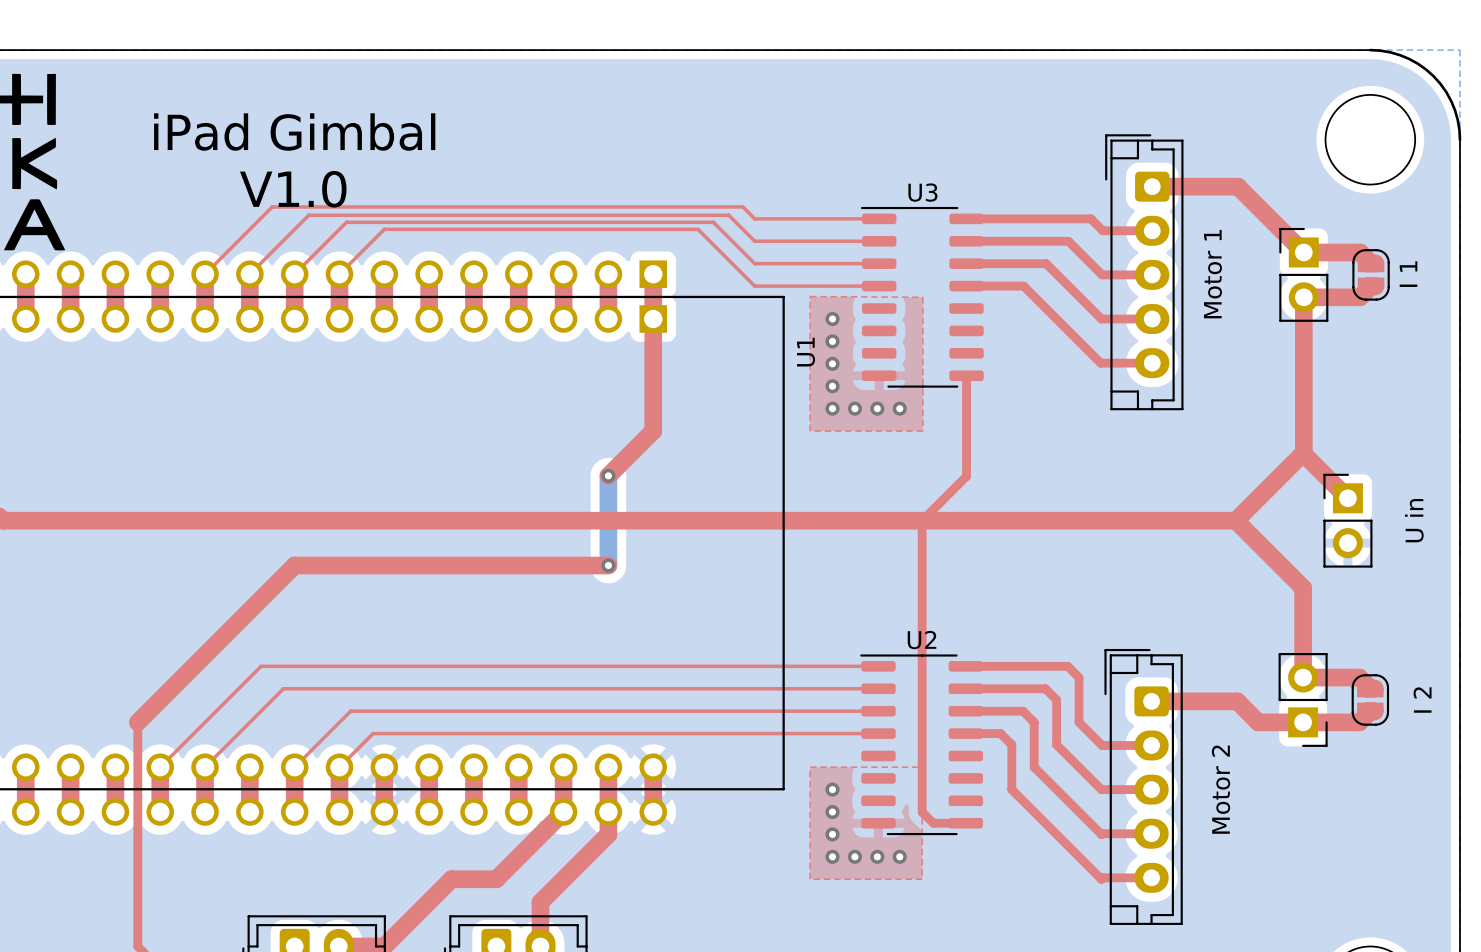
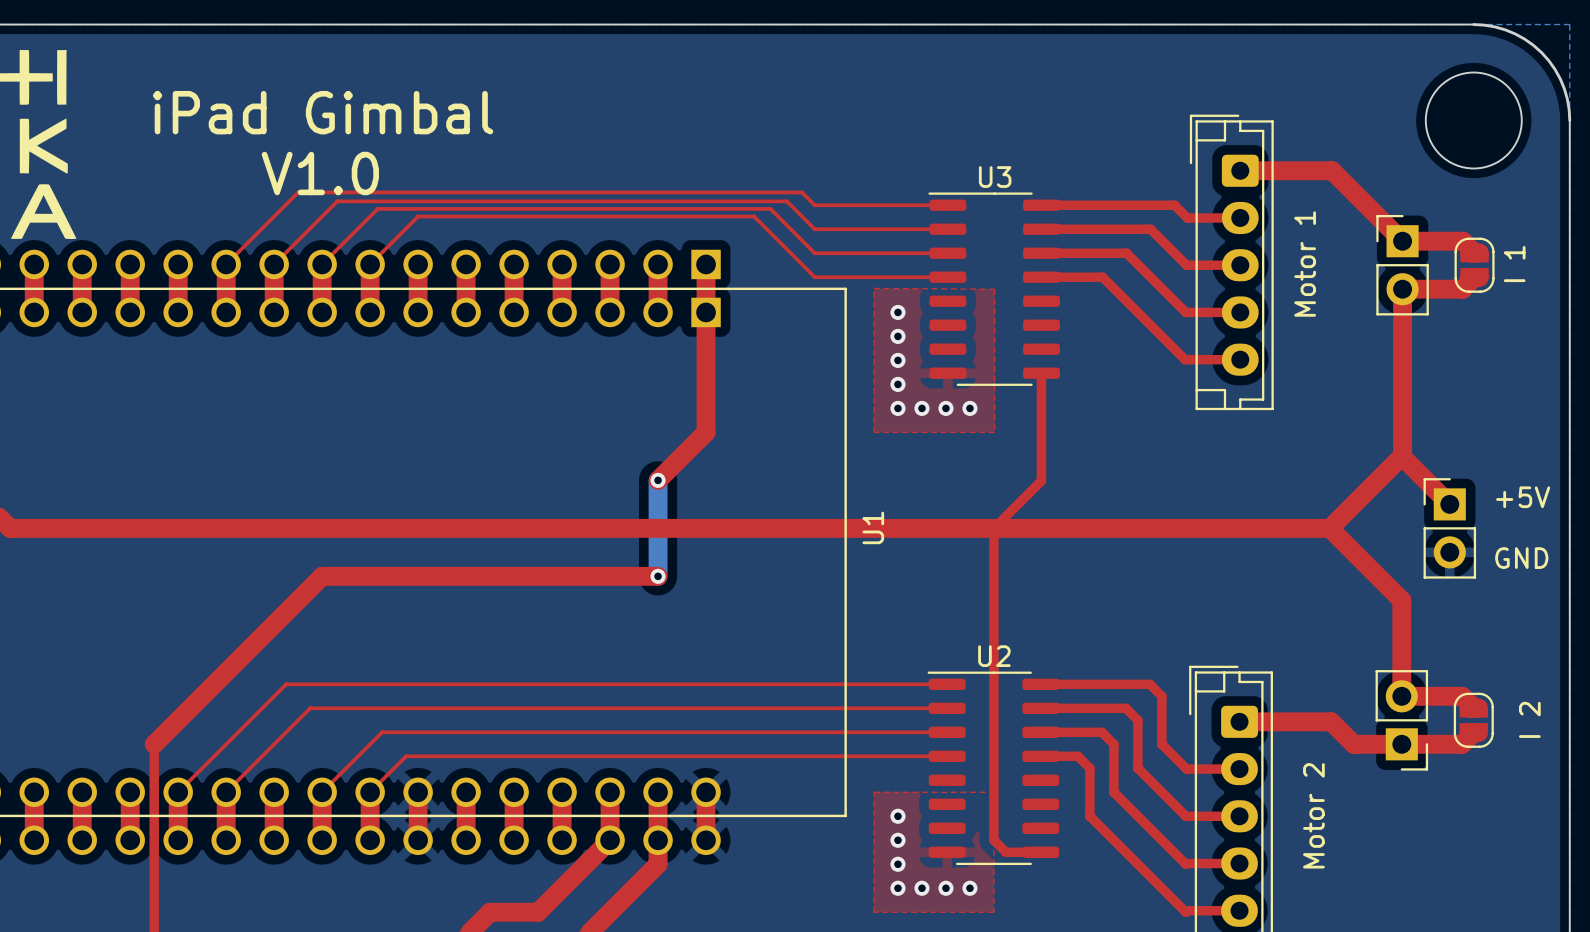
U1 name position: U1 (806, 352) -> U1 (873, 527)
text: none -> +5V (1523, 497)
text: U in (1414, 520) -> none
text: none -> GND (1521, 558)

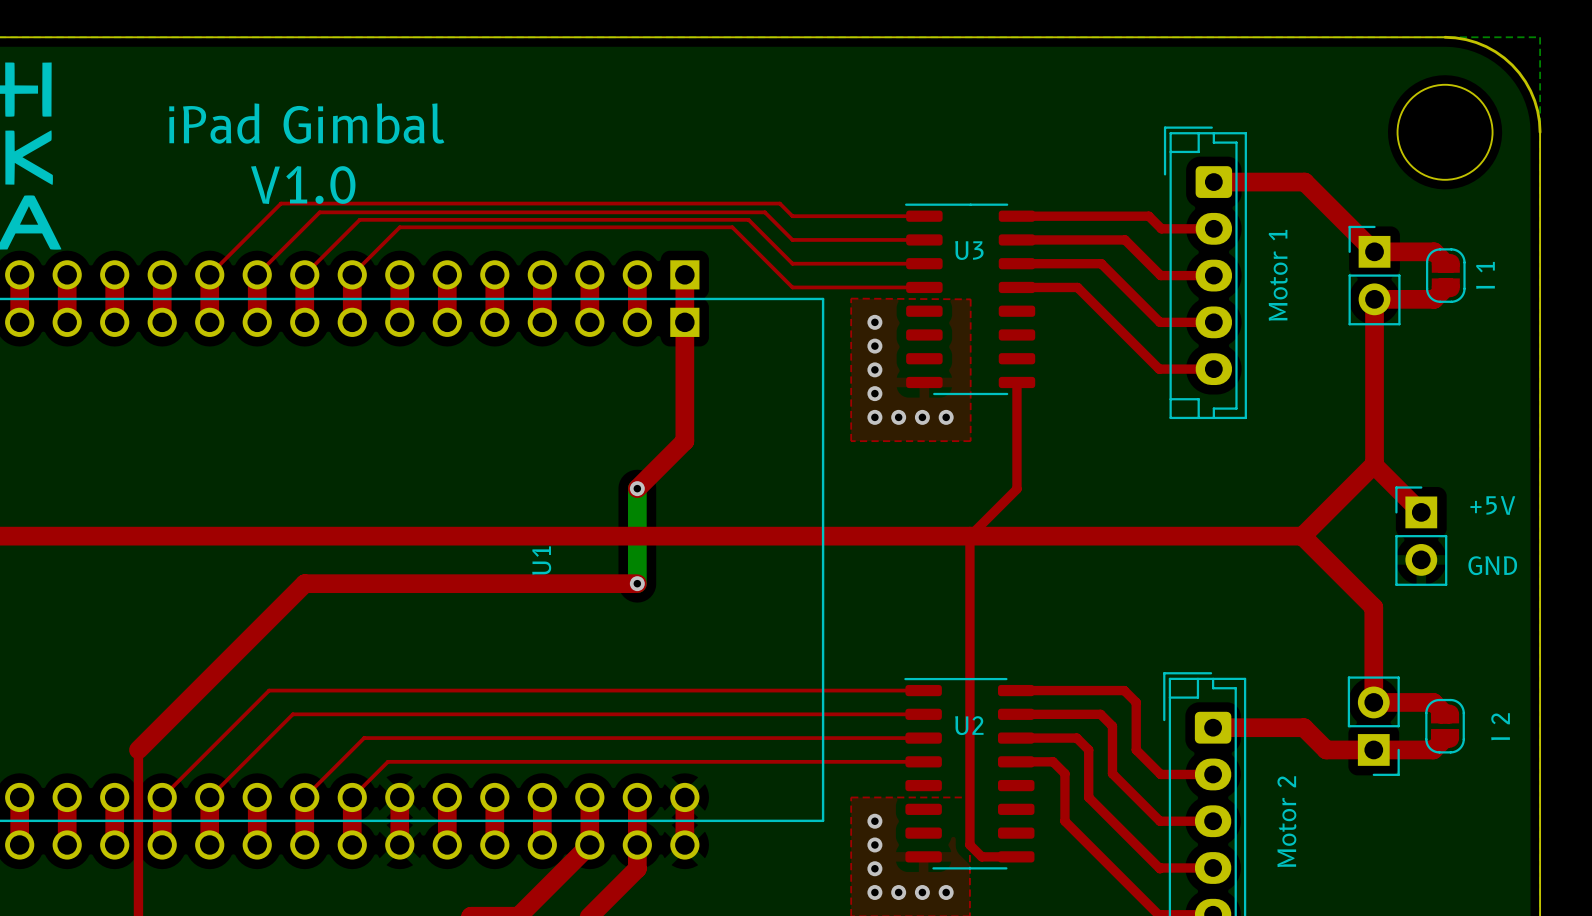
U3 name position: U3 (995, 177) -> U3 (969, 250)
U1 name position: U1 (873, 527) -> U1 (541, 560)
U2 name position: U2 (994, 656) -> U2 (969, 725)

